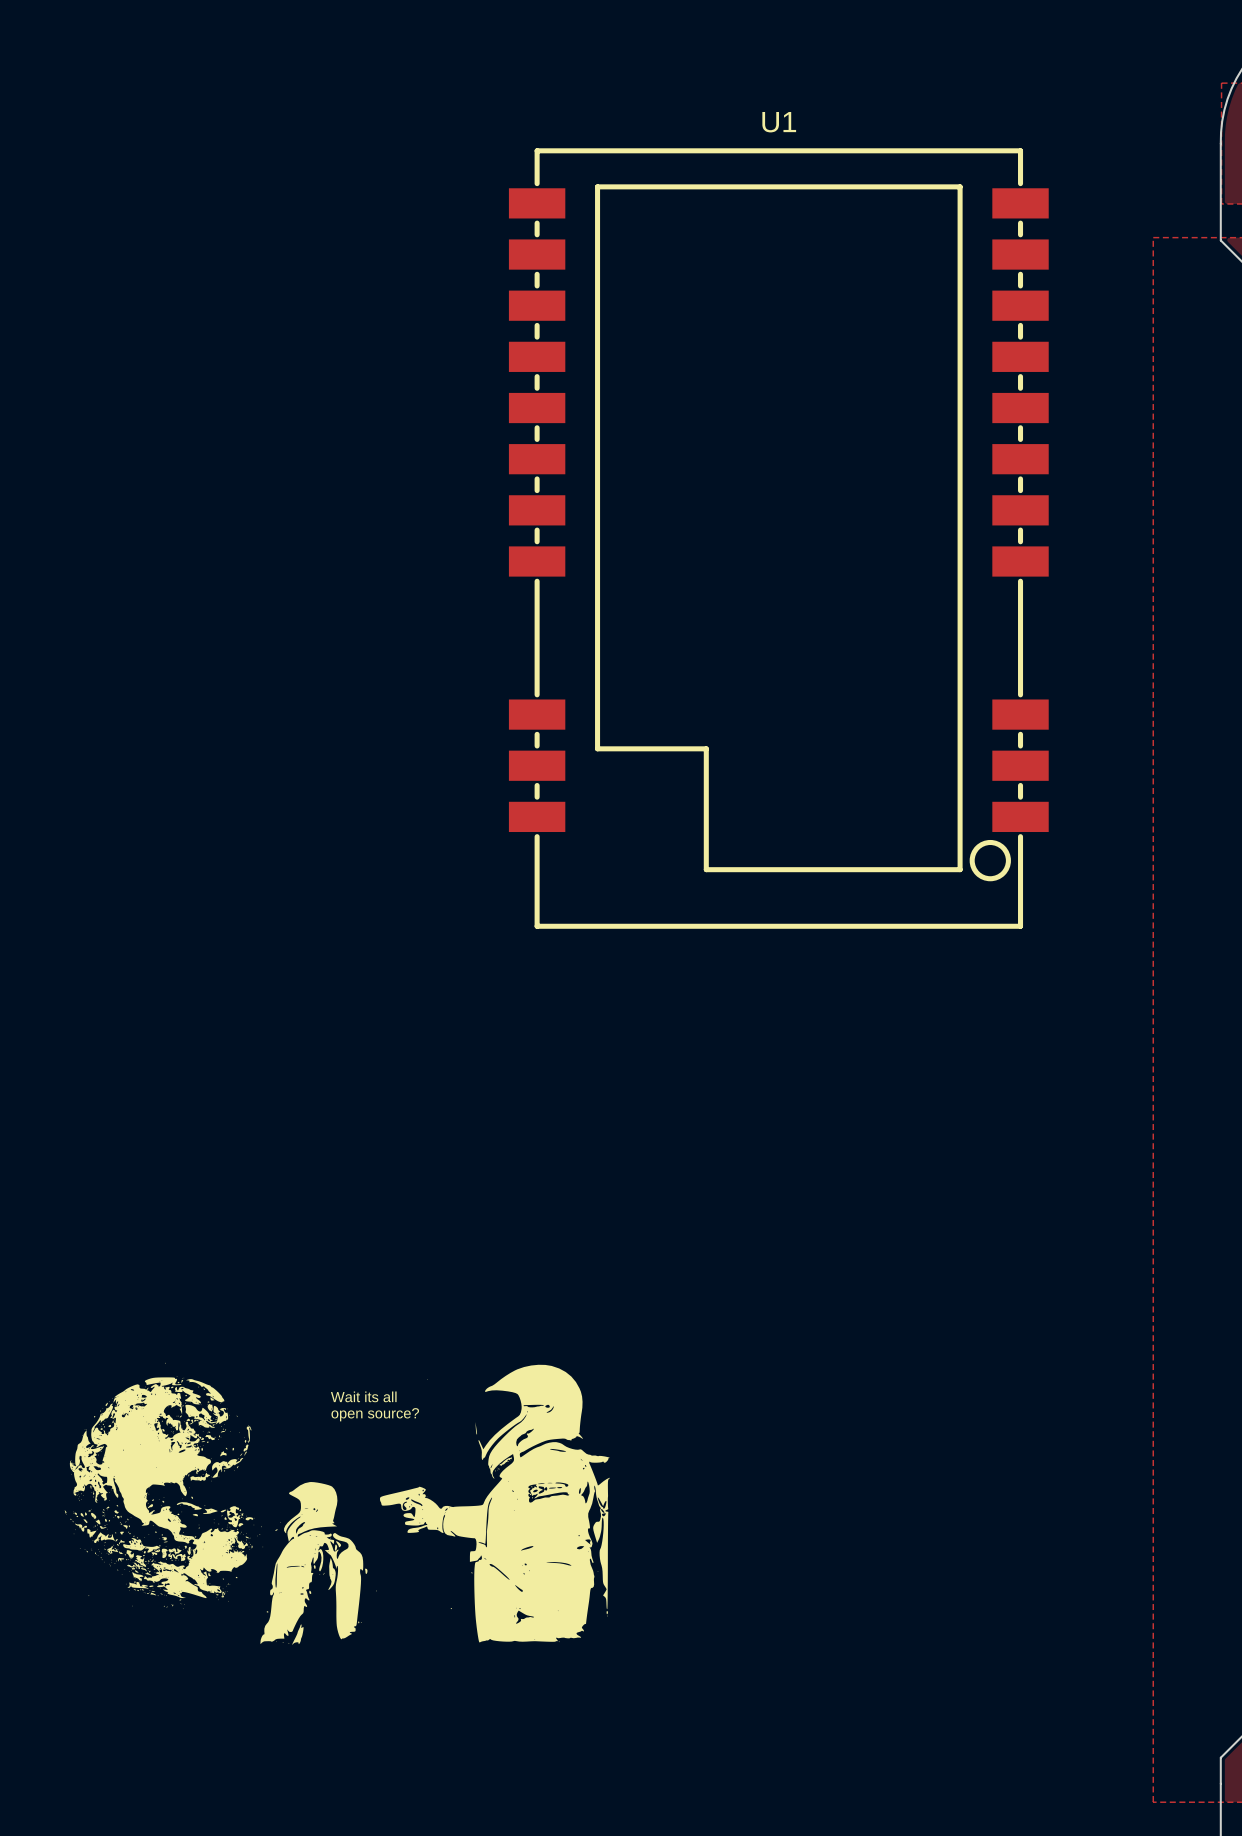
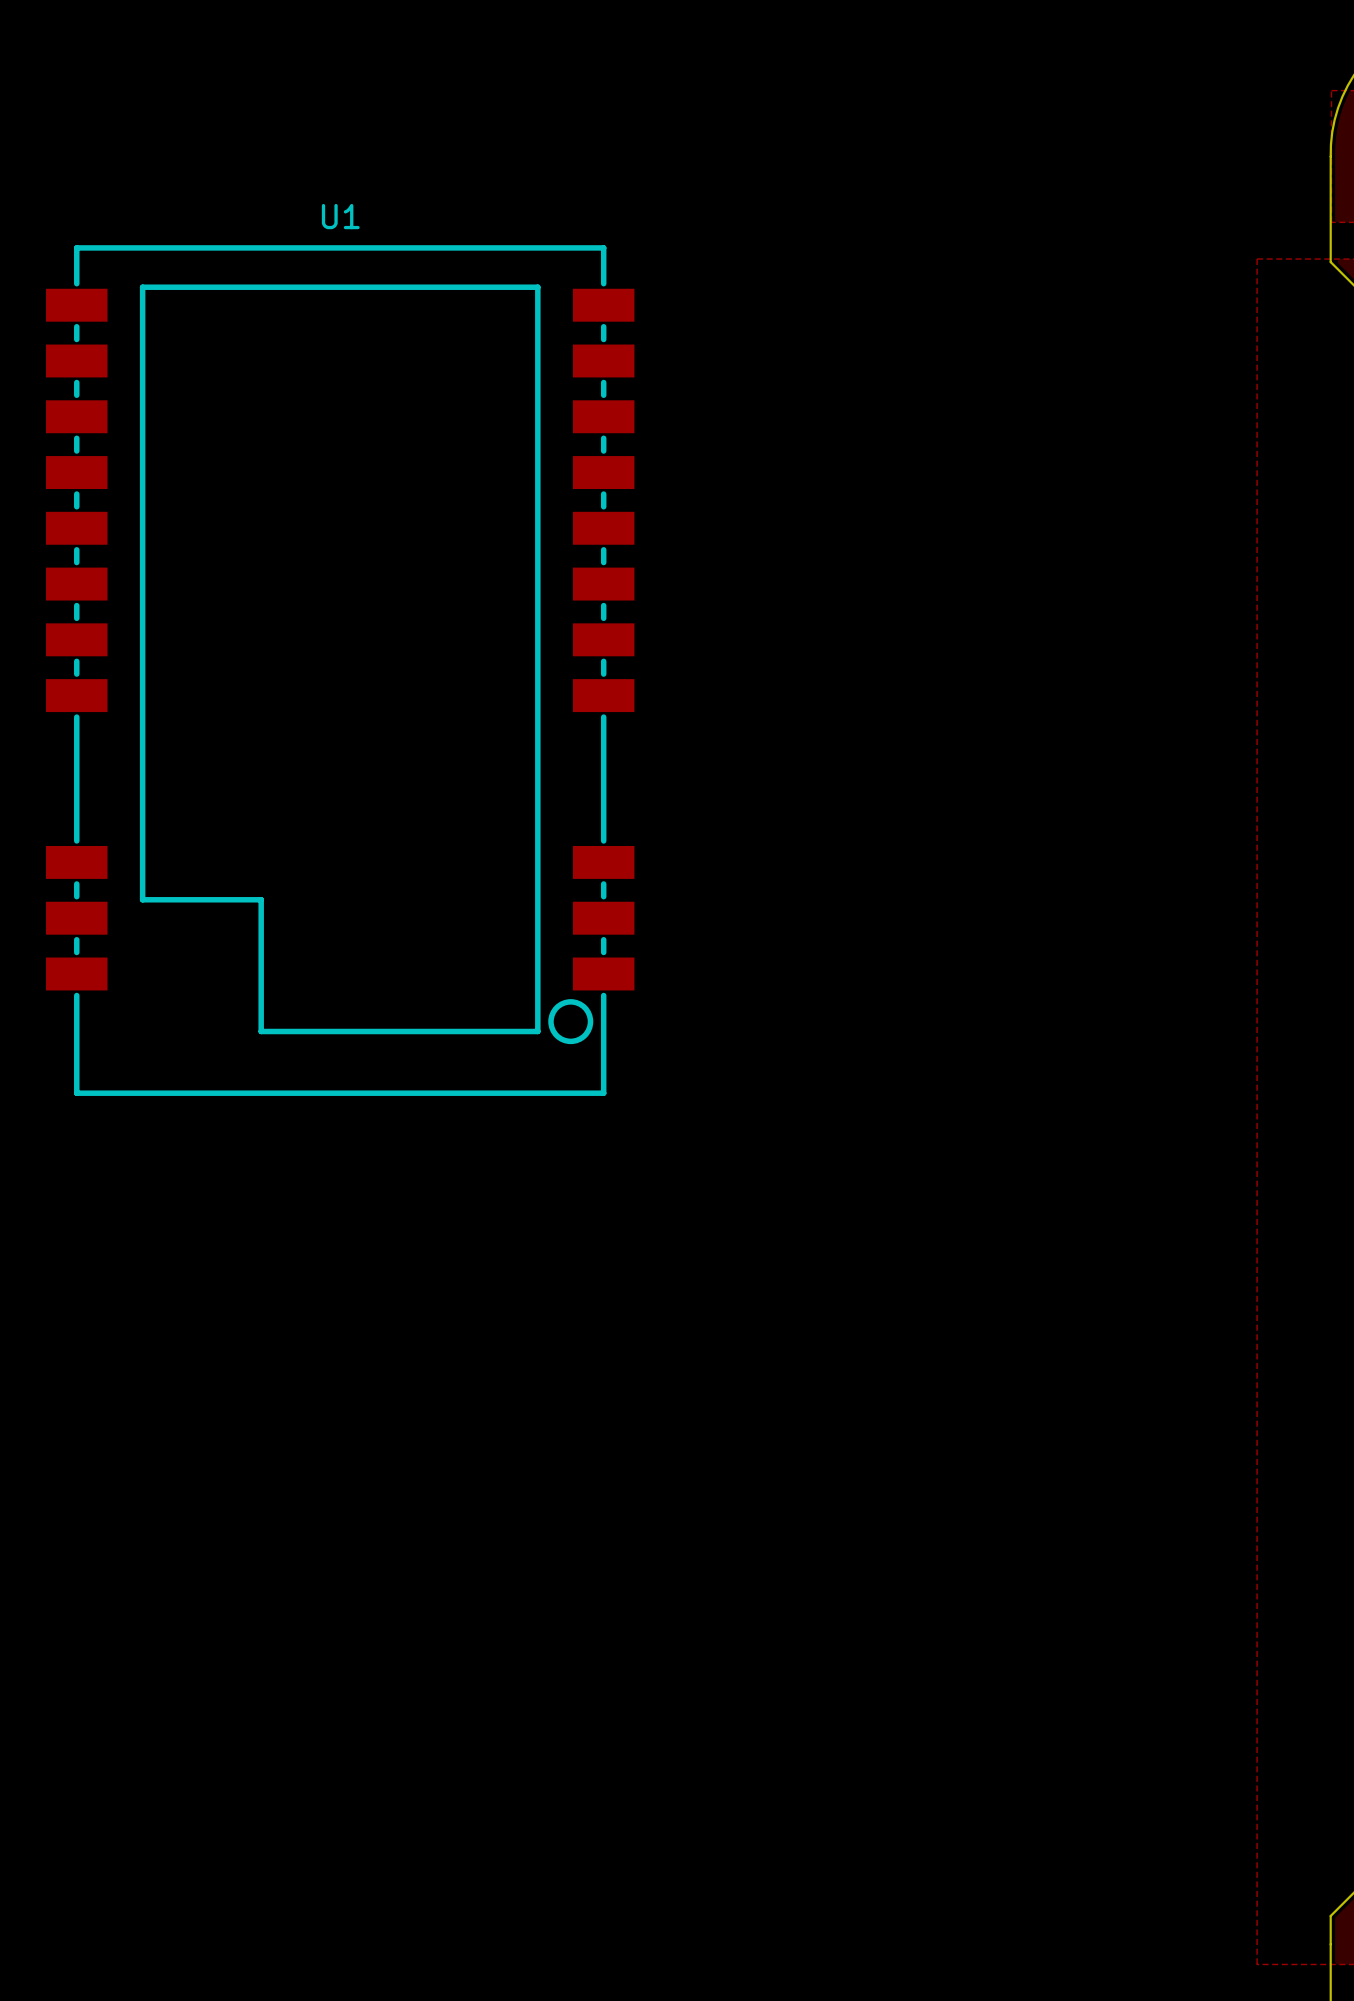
U1 position: (778, 538) -> (340, 670)
drawing: [64, 1362, 610, 1645] -> none
text: Wait its all (363, 1396) -> none
text: open source? (375, 1414) -> none

